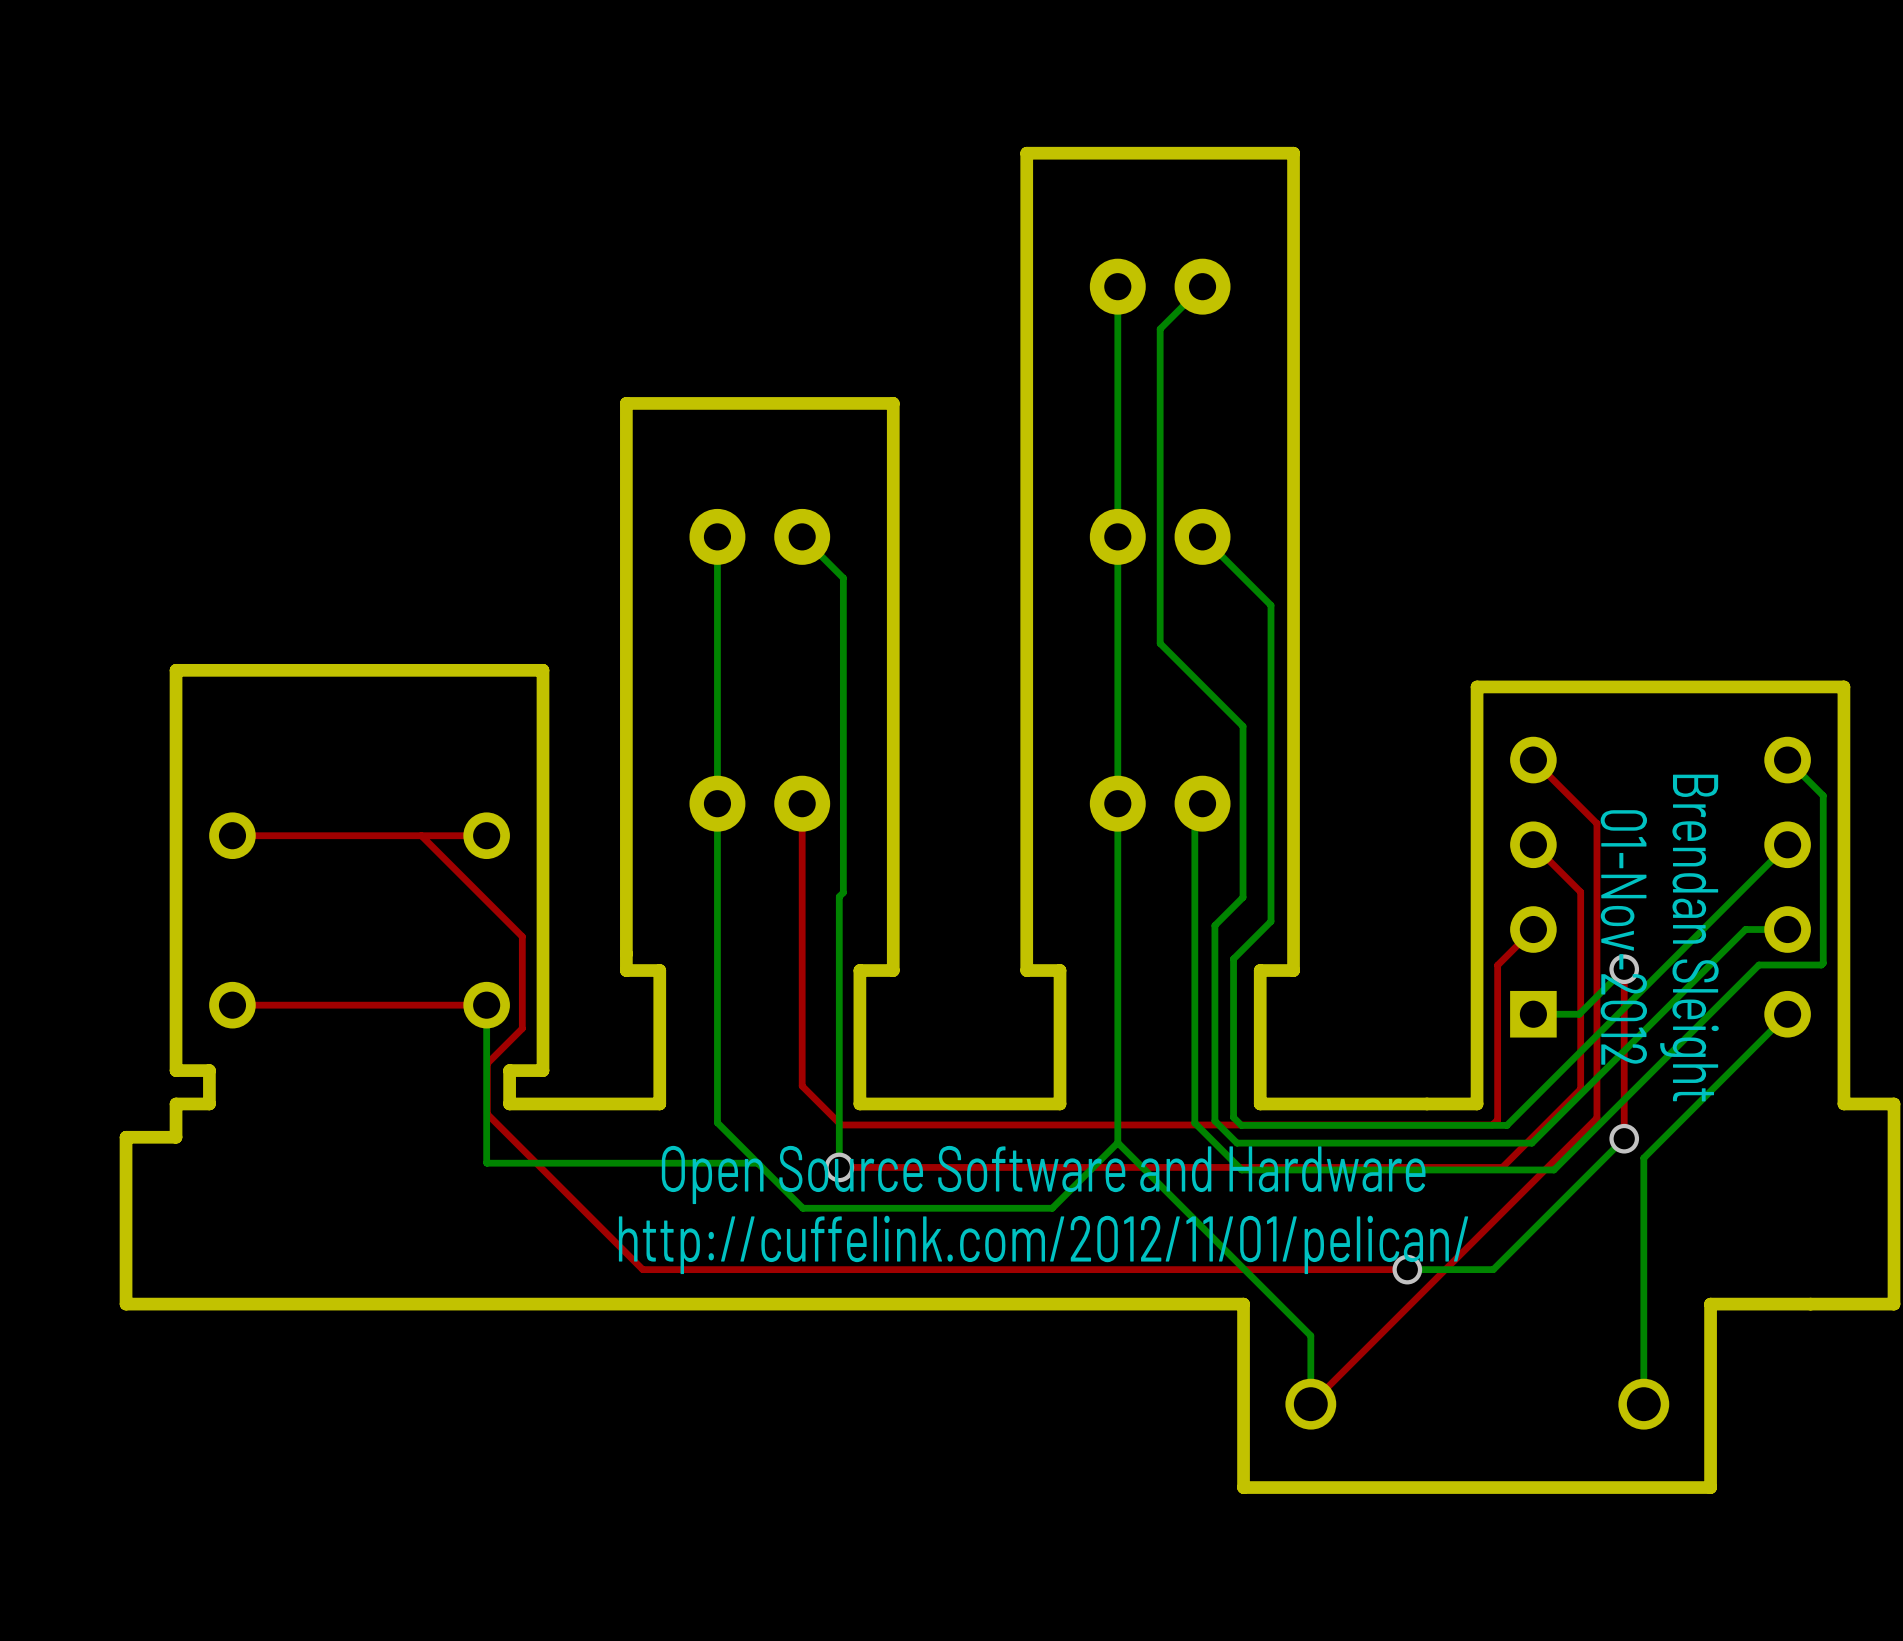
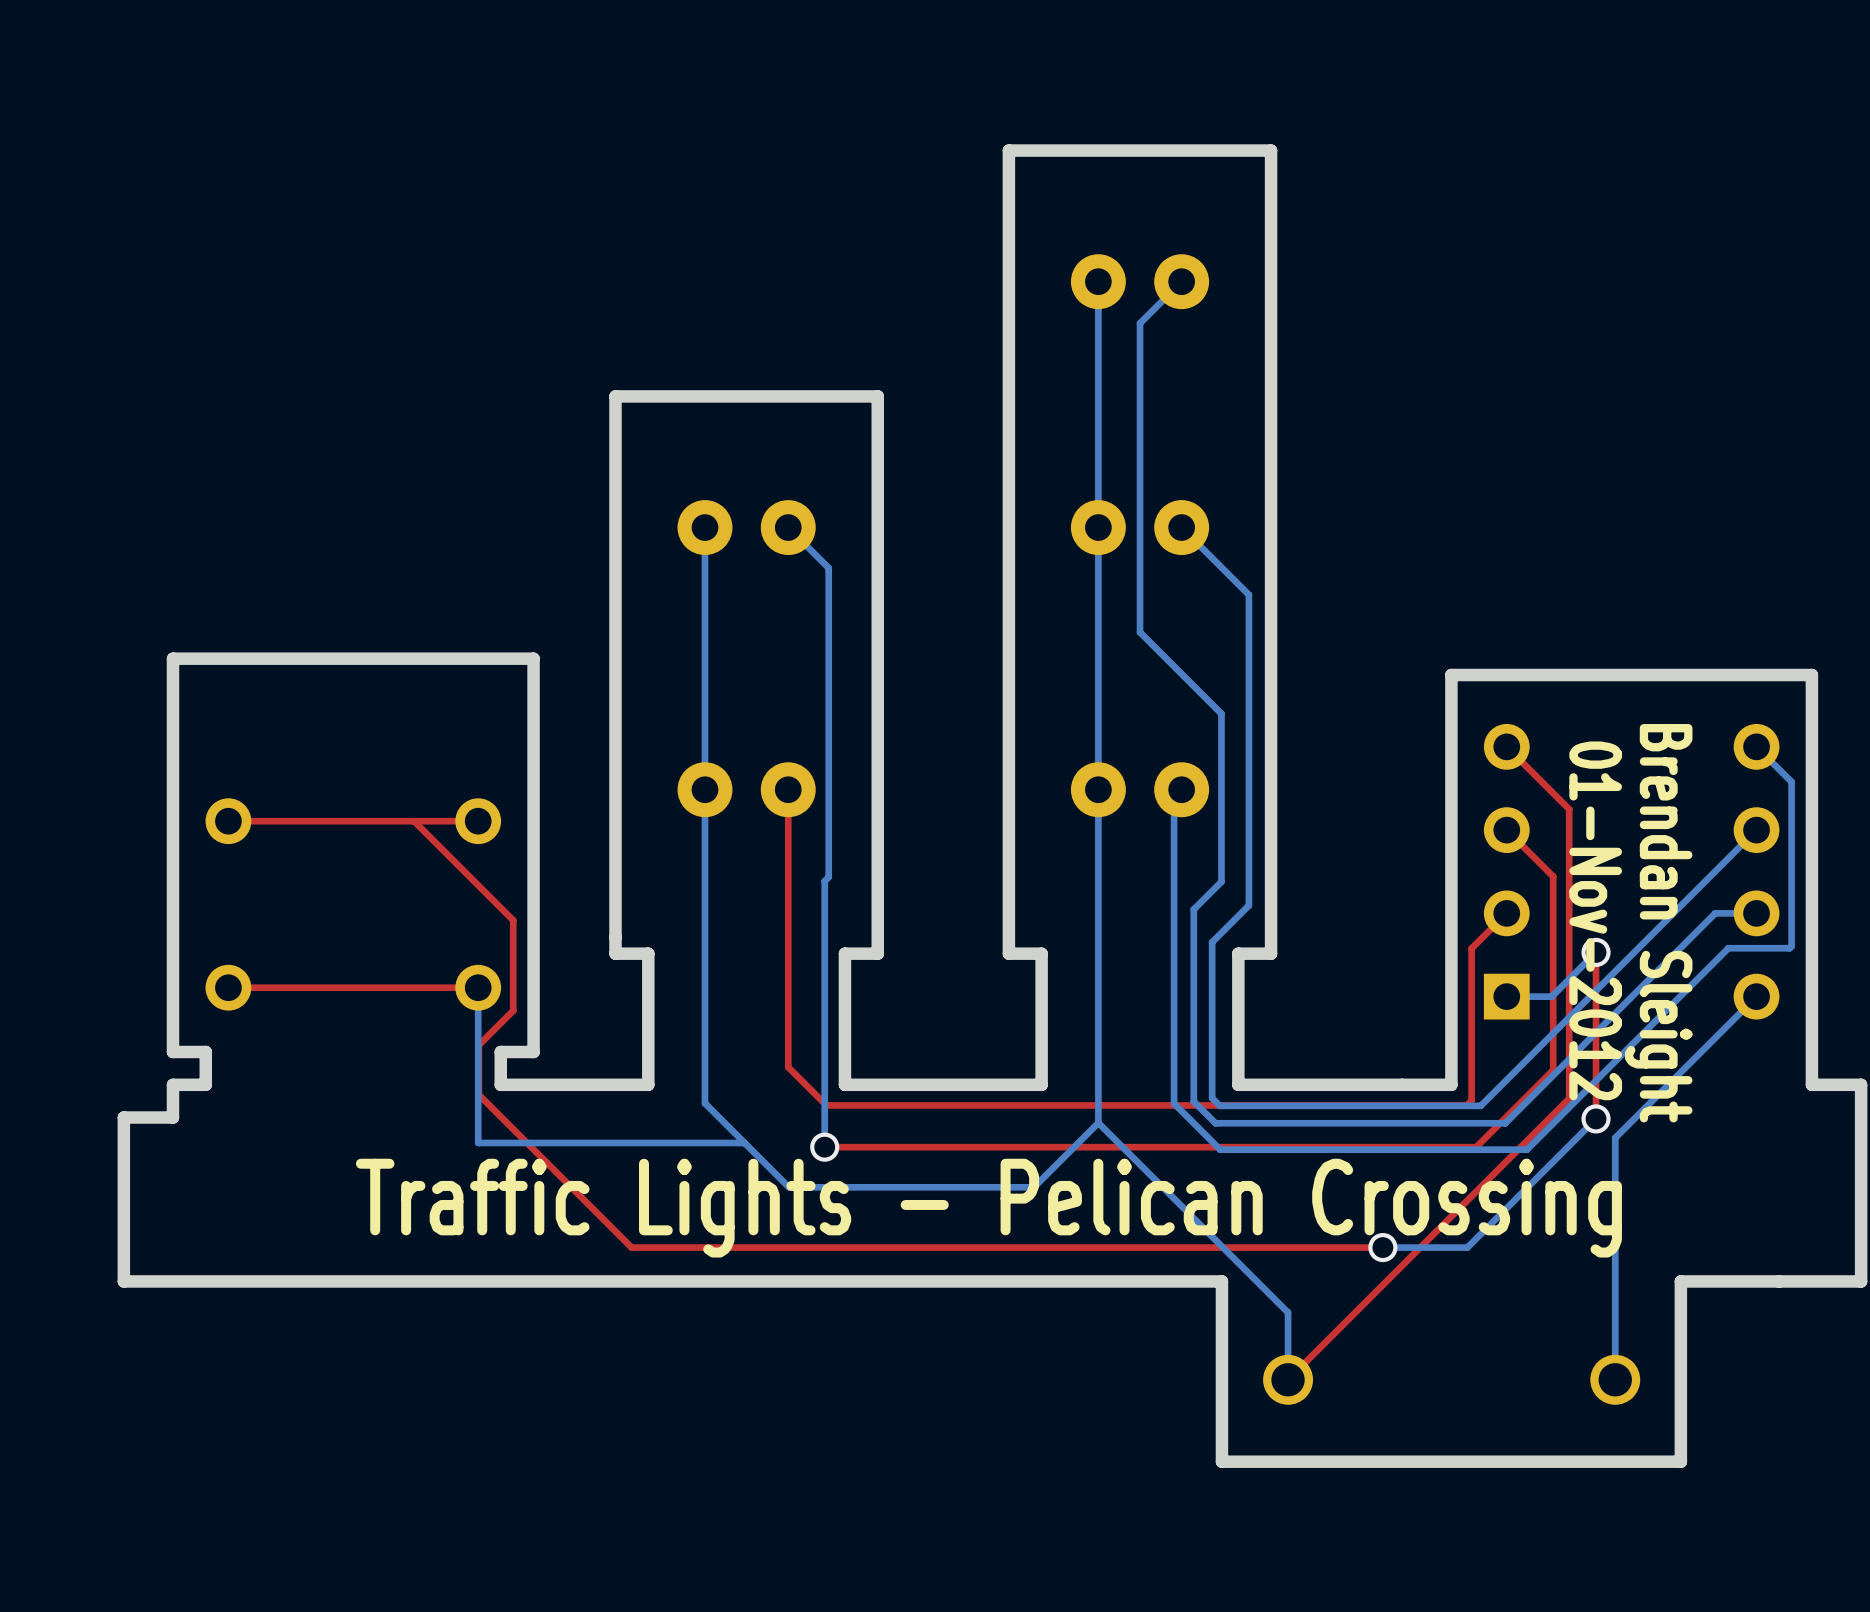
text: Open Source Software and Hardware (1043, 1174) -> none
text: none -> Traffic Lights - Pelican Crossing (988, 1208)
text: http://cuffelink.com/2012/11/01/pelican/ (1043, 1244) -> none

